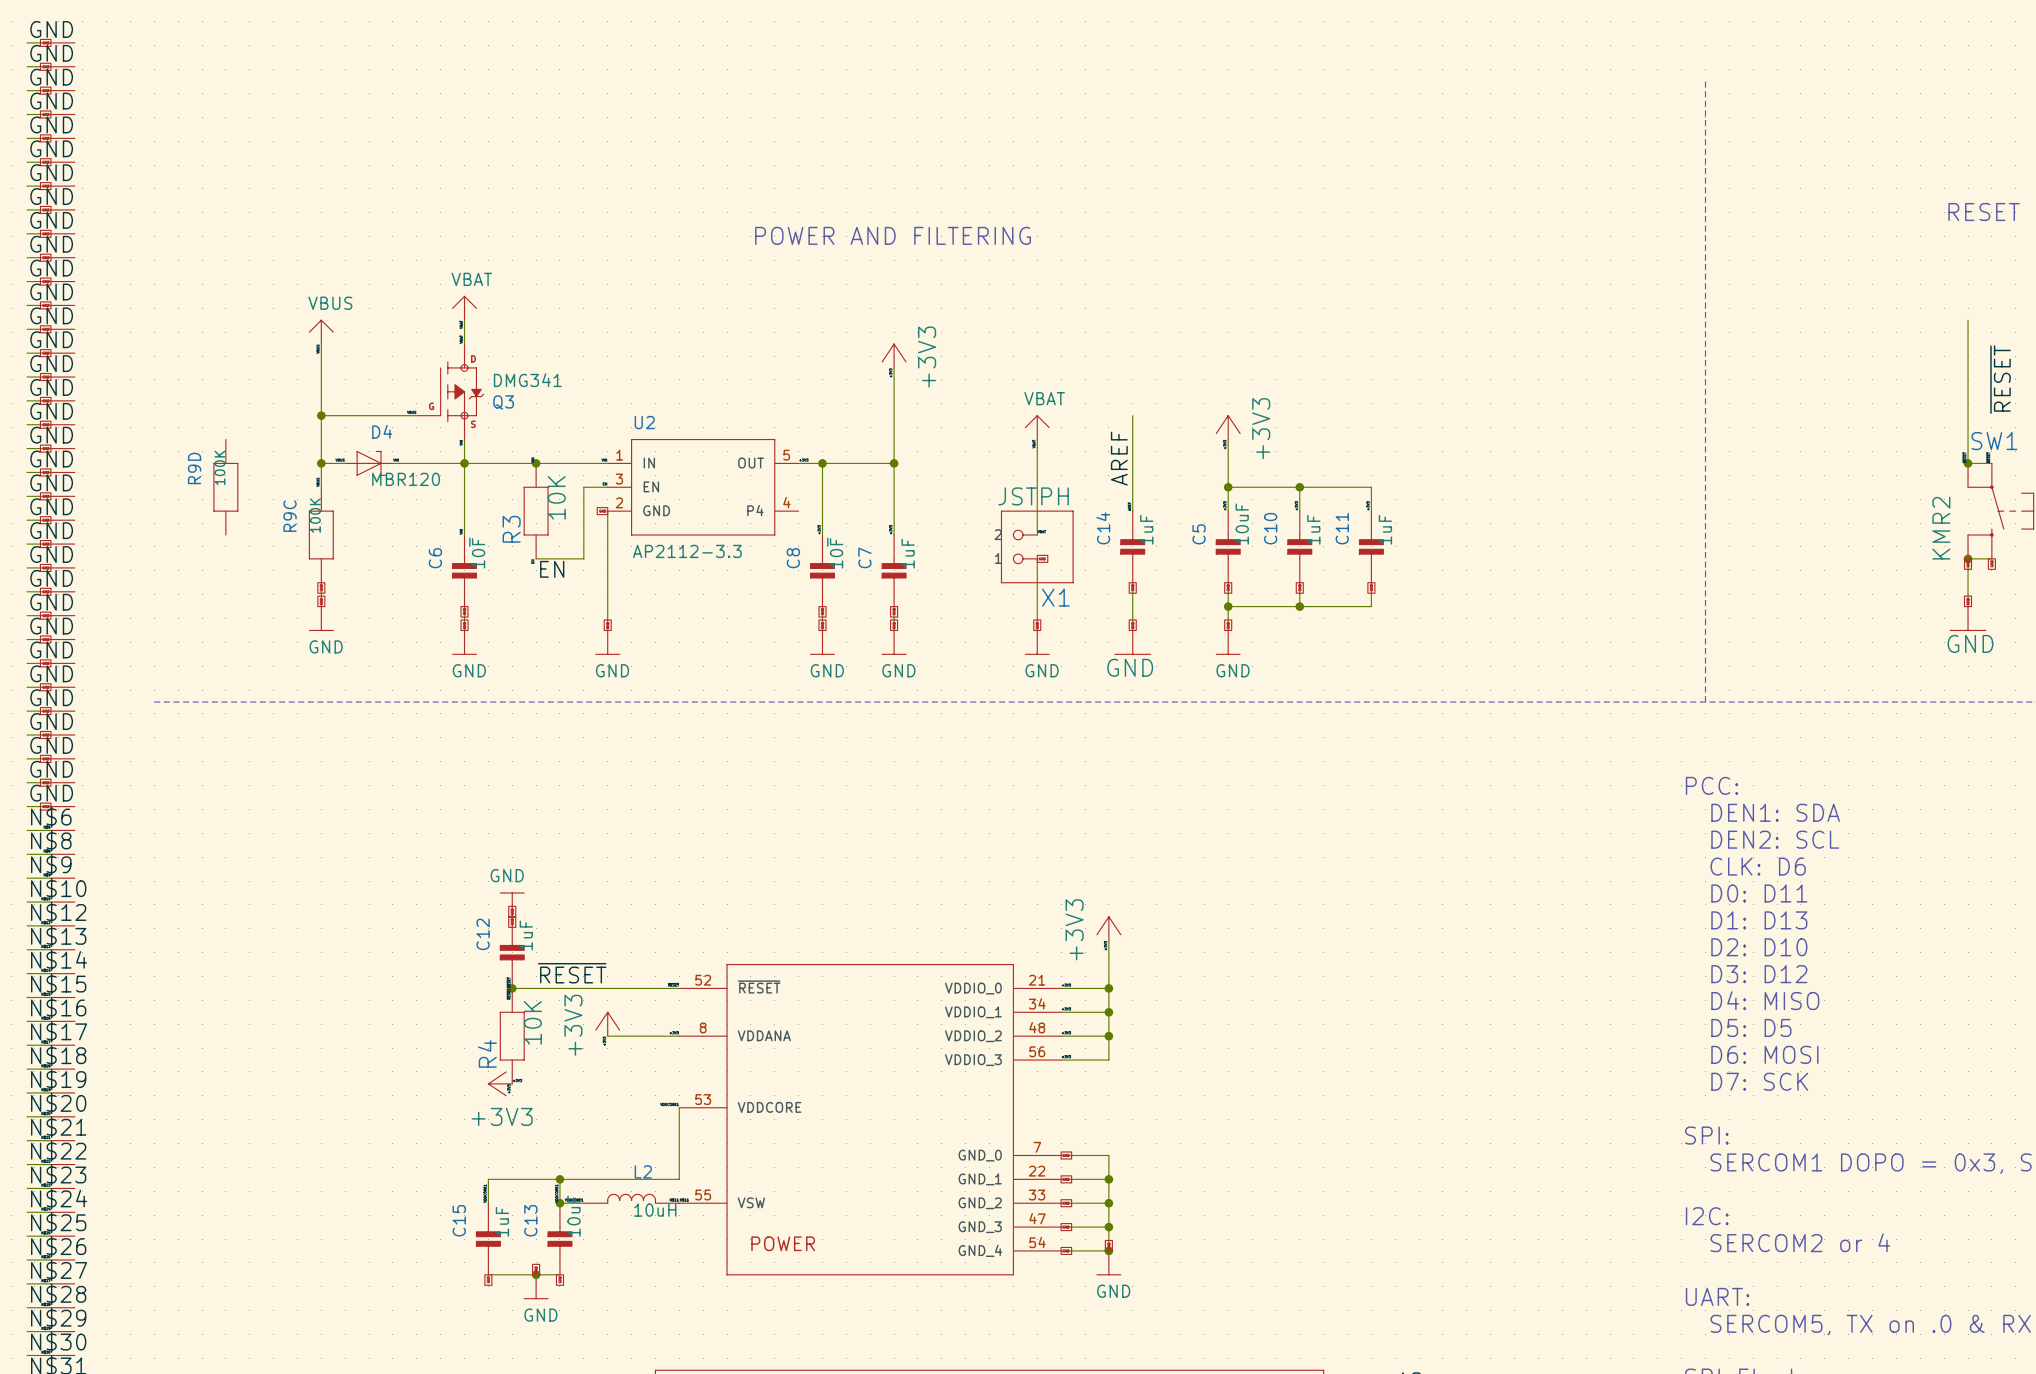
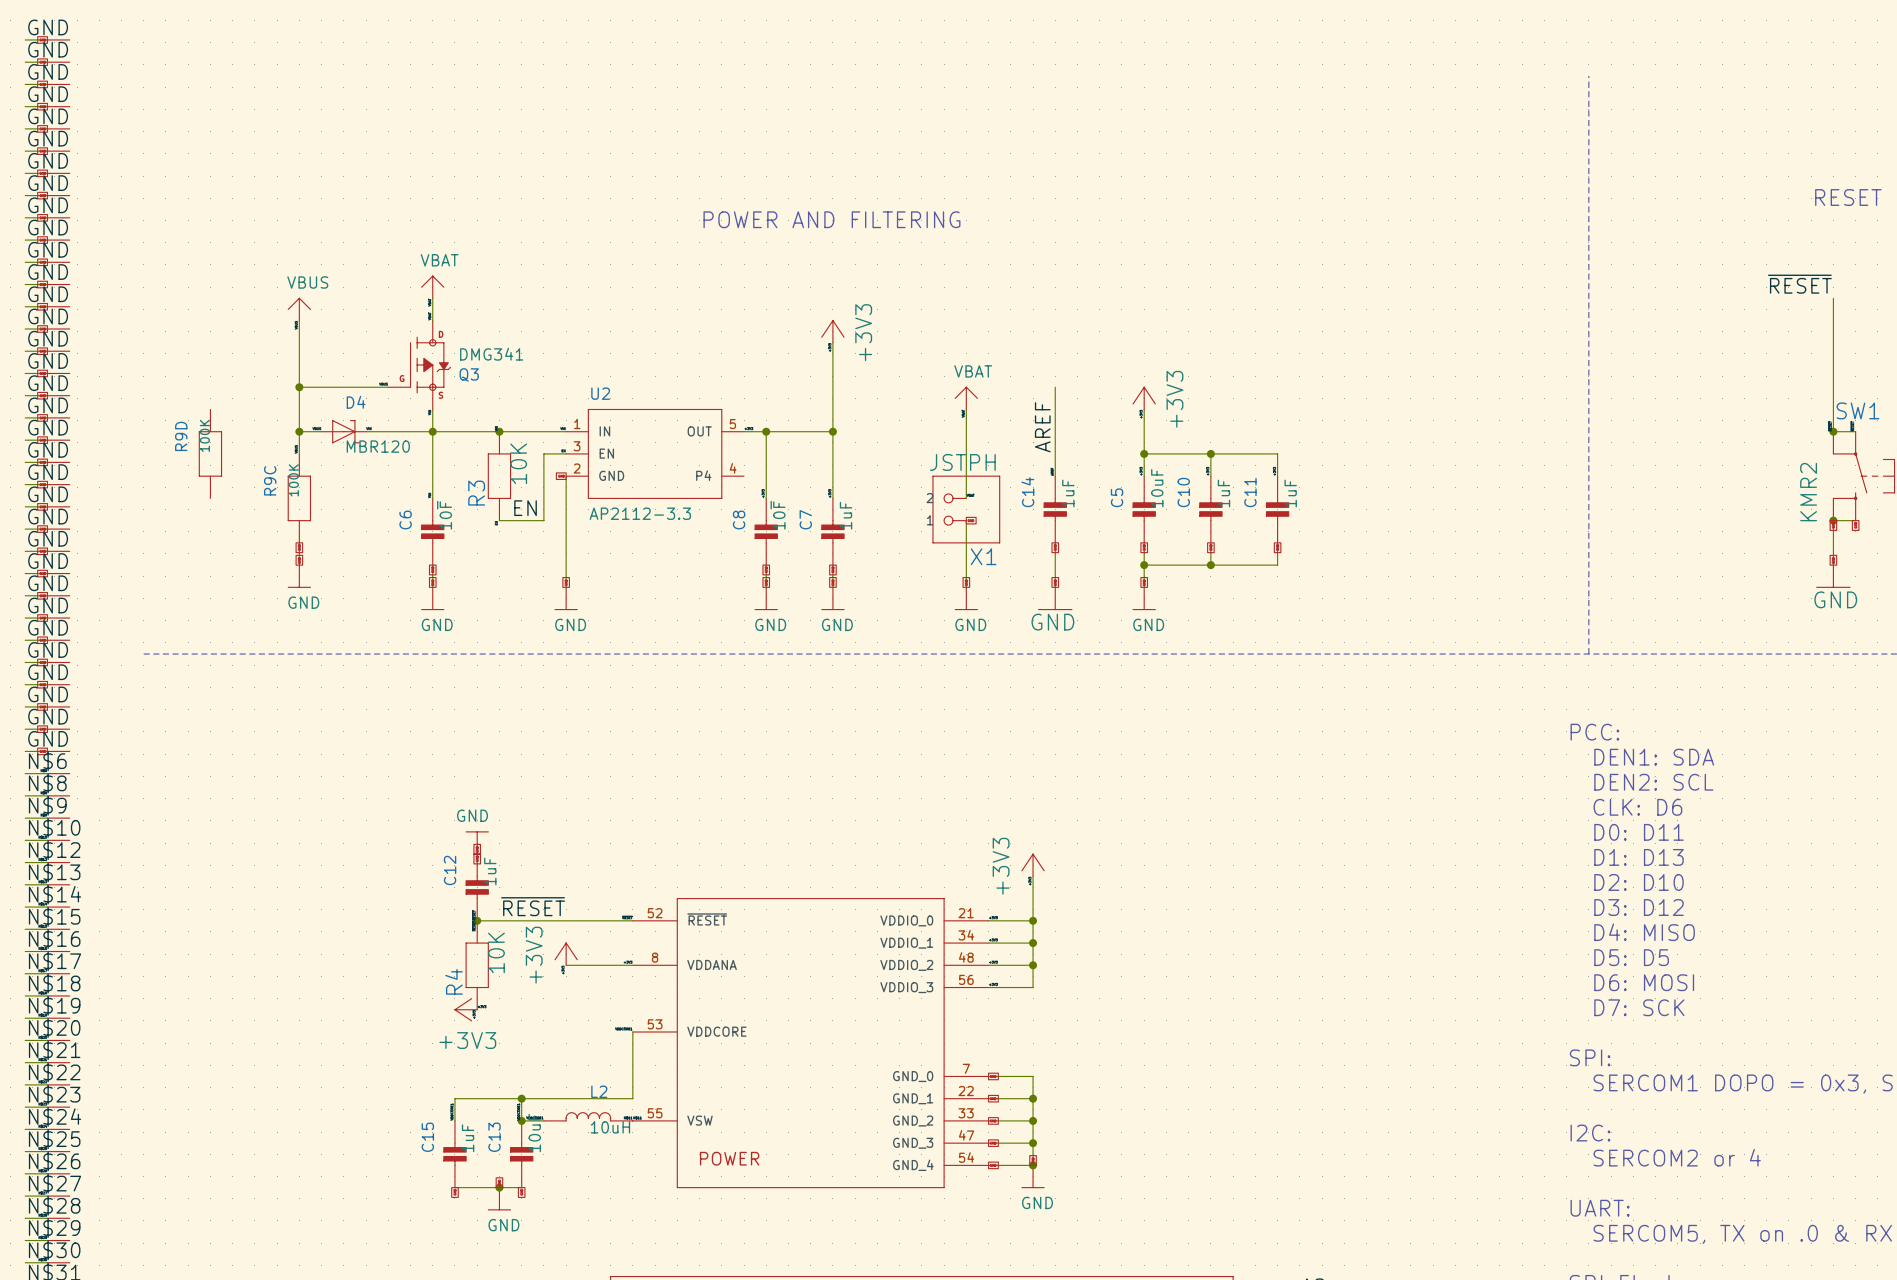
label rotation: 0° (2000, 379) -> 90° clockwise (1799, 284)
label position: EN (552, 569) -> EN (525, 508)

